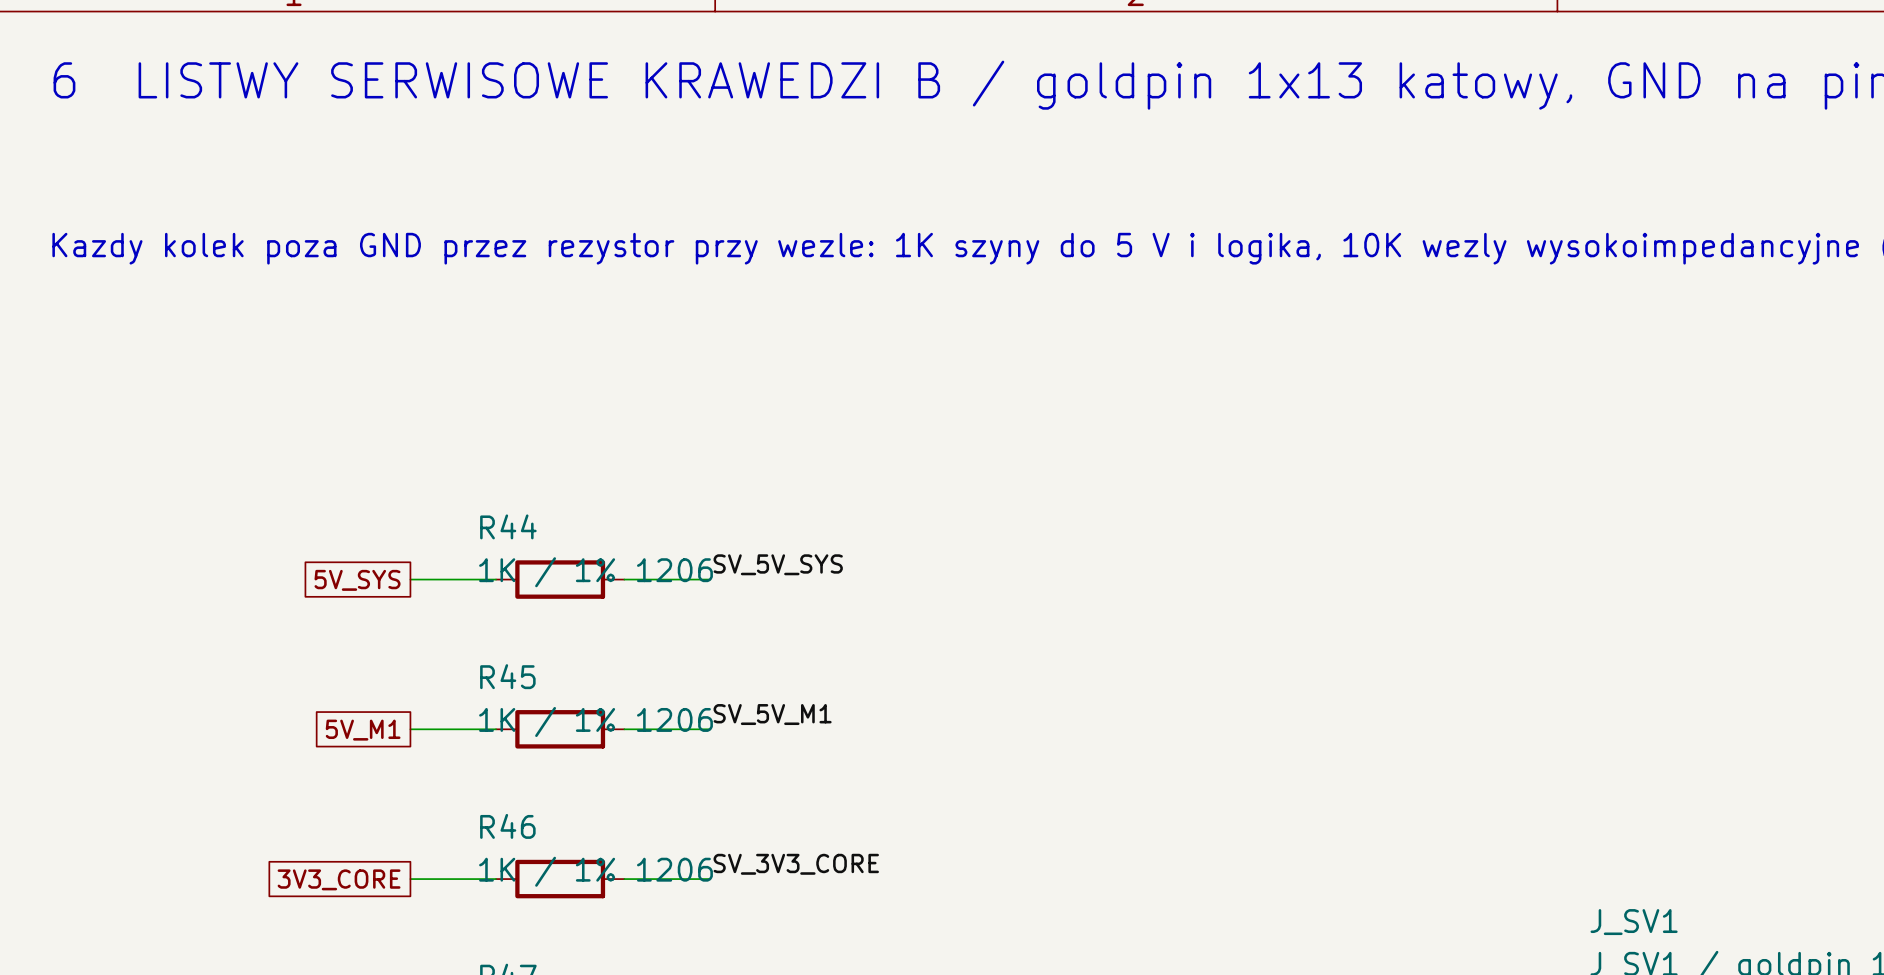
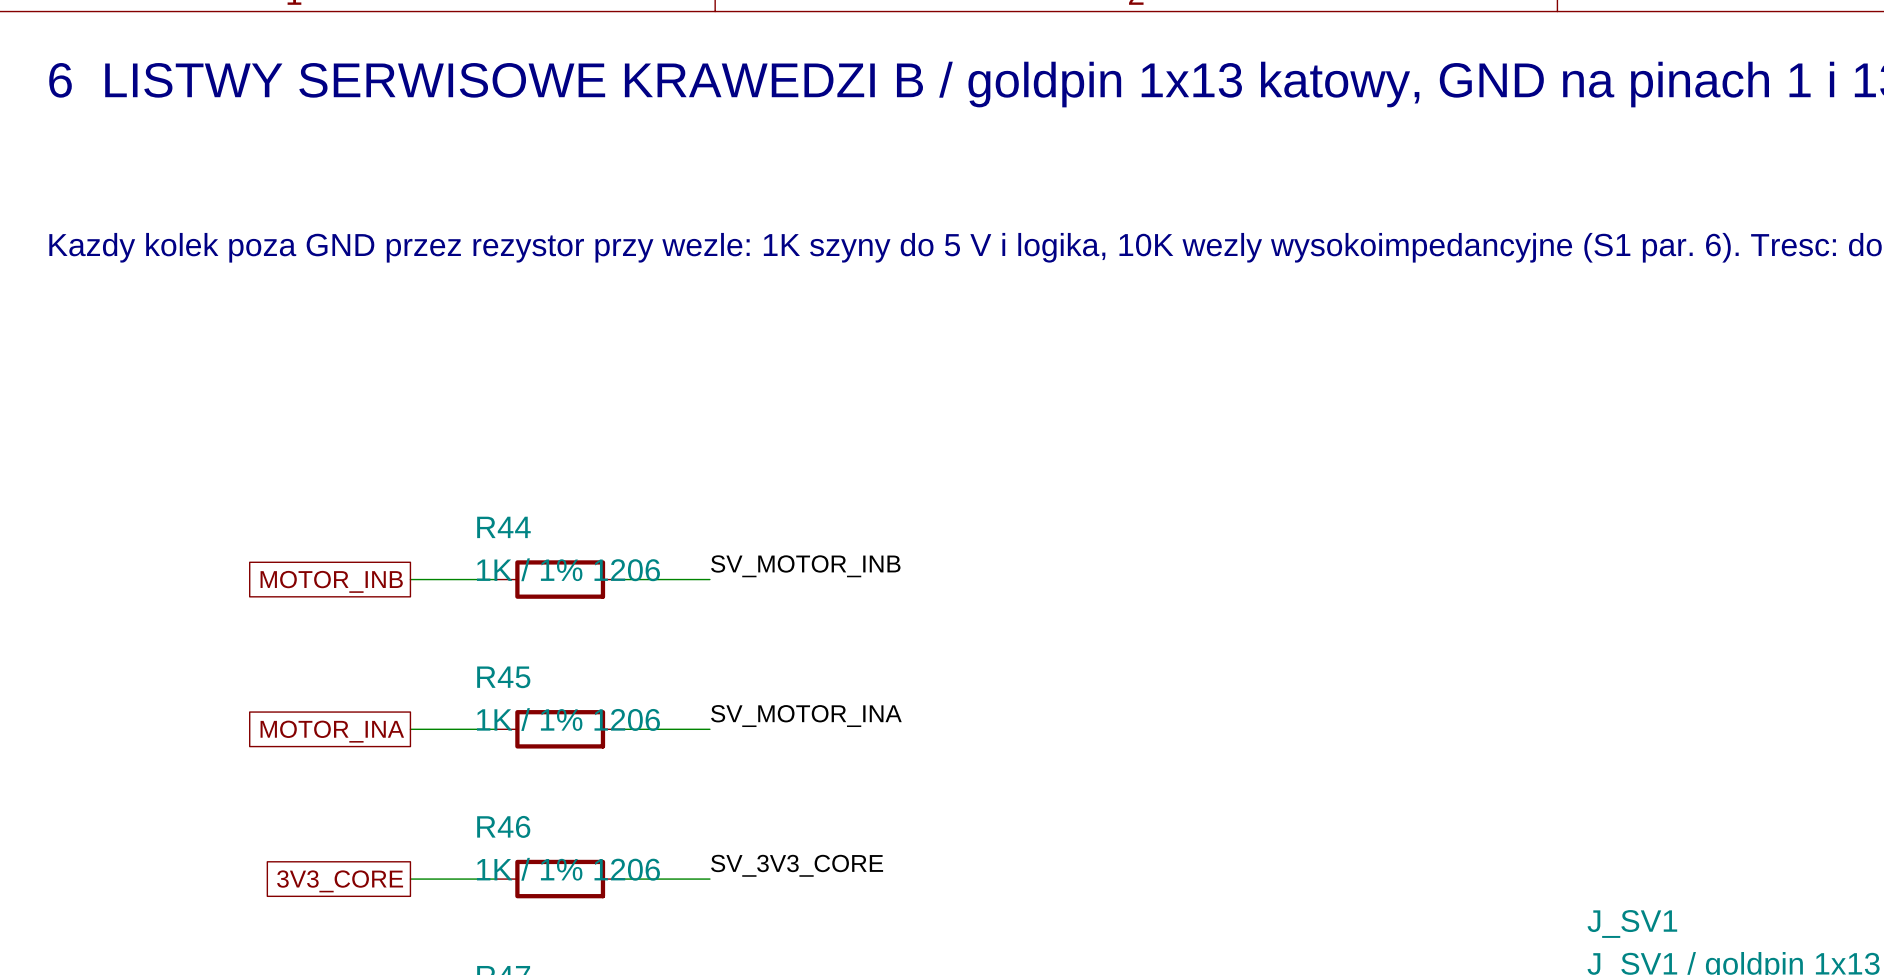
label: SV_5V_SYS (778, 564) -> SV_MOTOR_INB (805, 566)
global label: 5V_SYS (357, 580) -> MOTOR_INB (331, 581)
label: SV_5V_M1 (772, 714) -> SV_MOTOR_INA (806, 716)
global label: 5V_M1 (363, 730) -> MOTOR_INA (332, 731)

